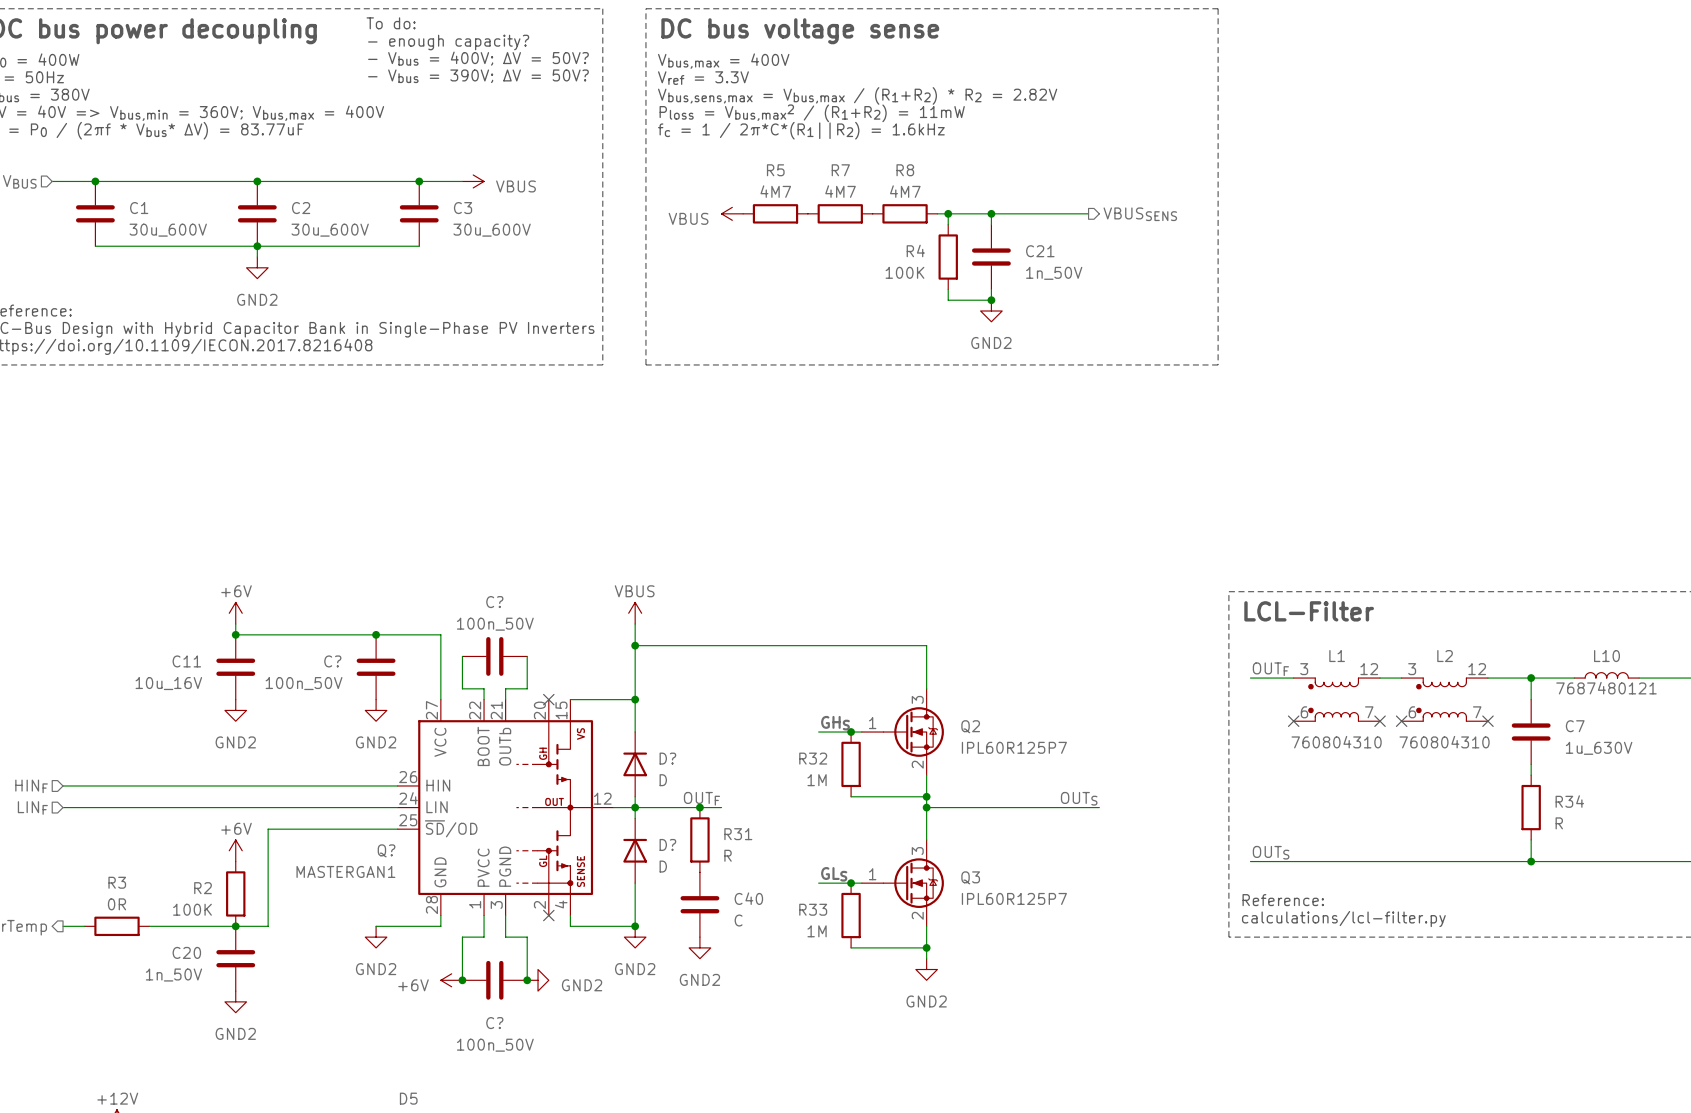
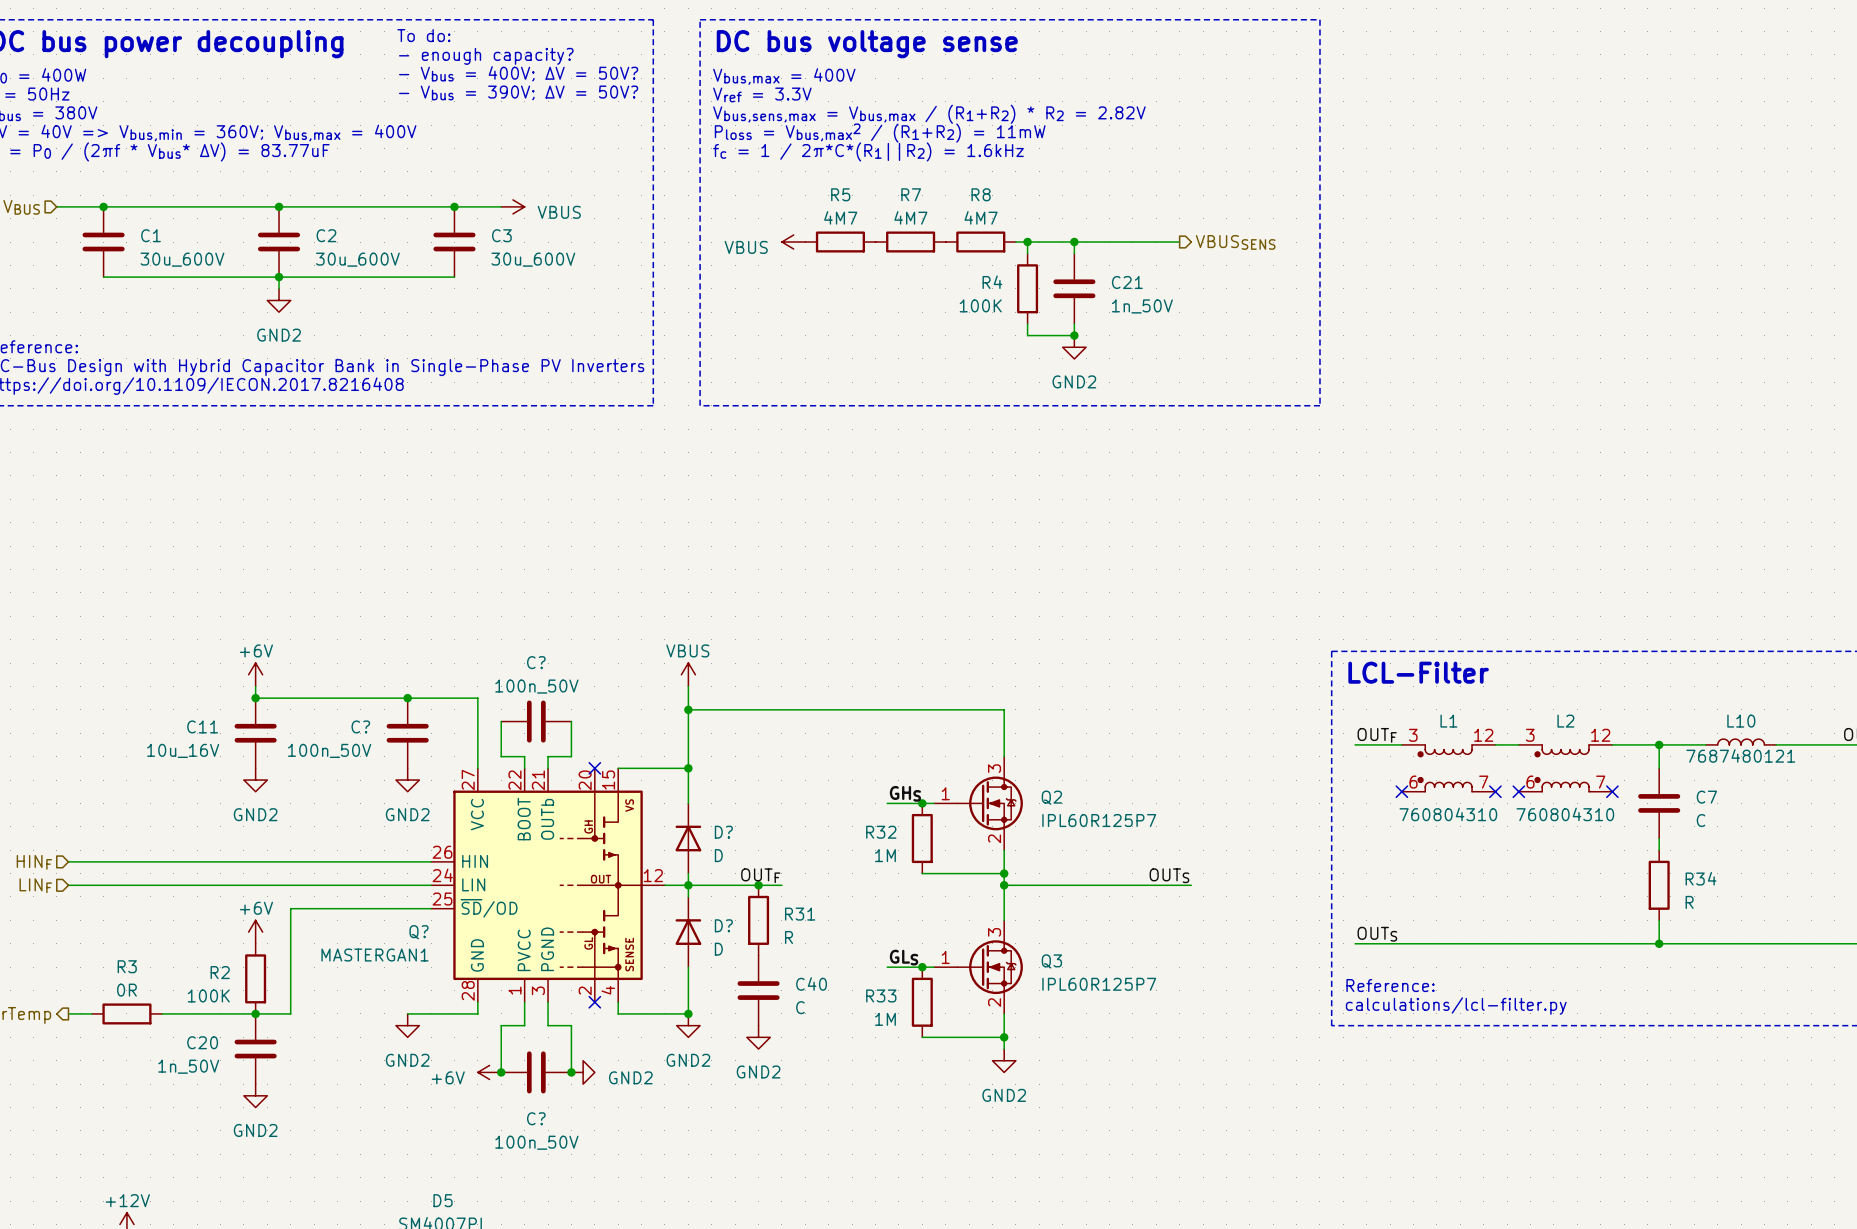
C7 value: 1u_630V (1599, 748) -> C (1701, 820)

